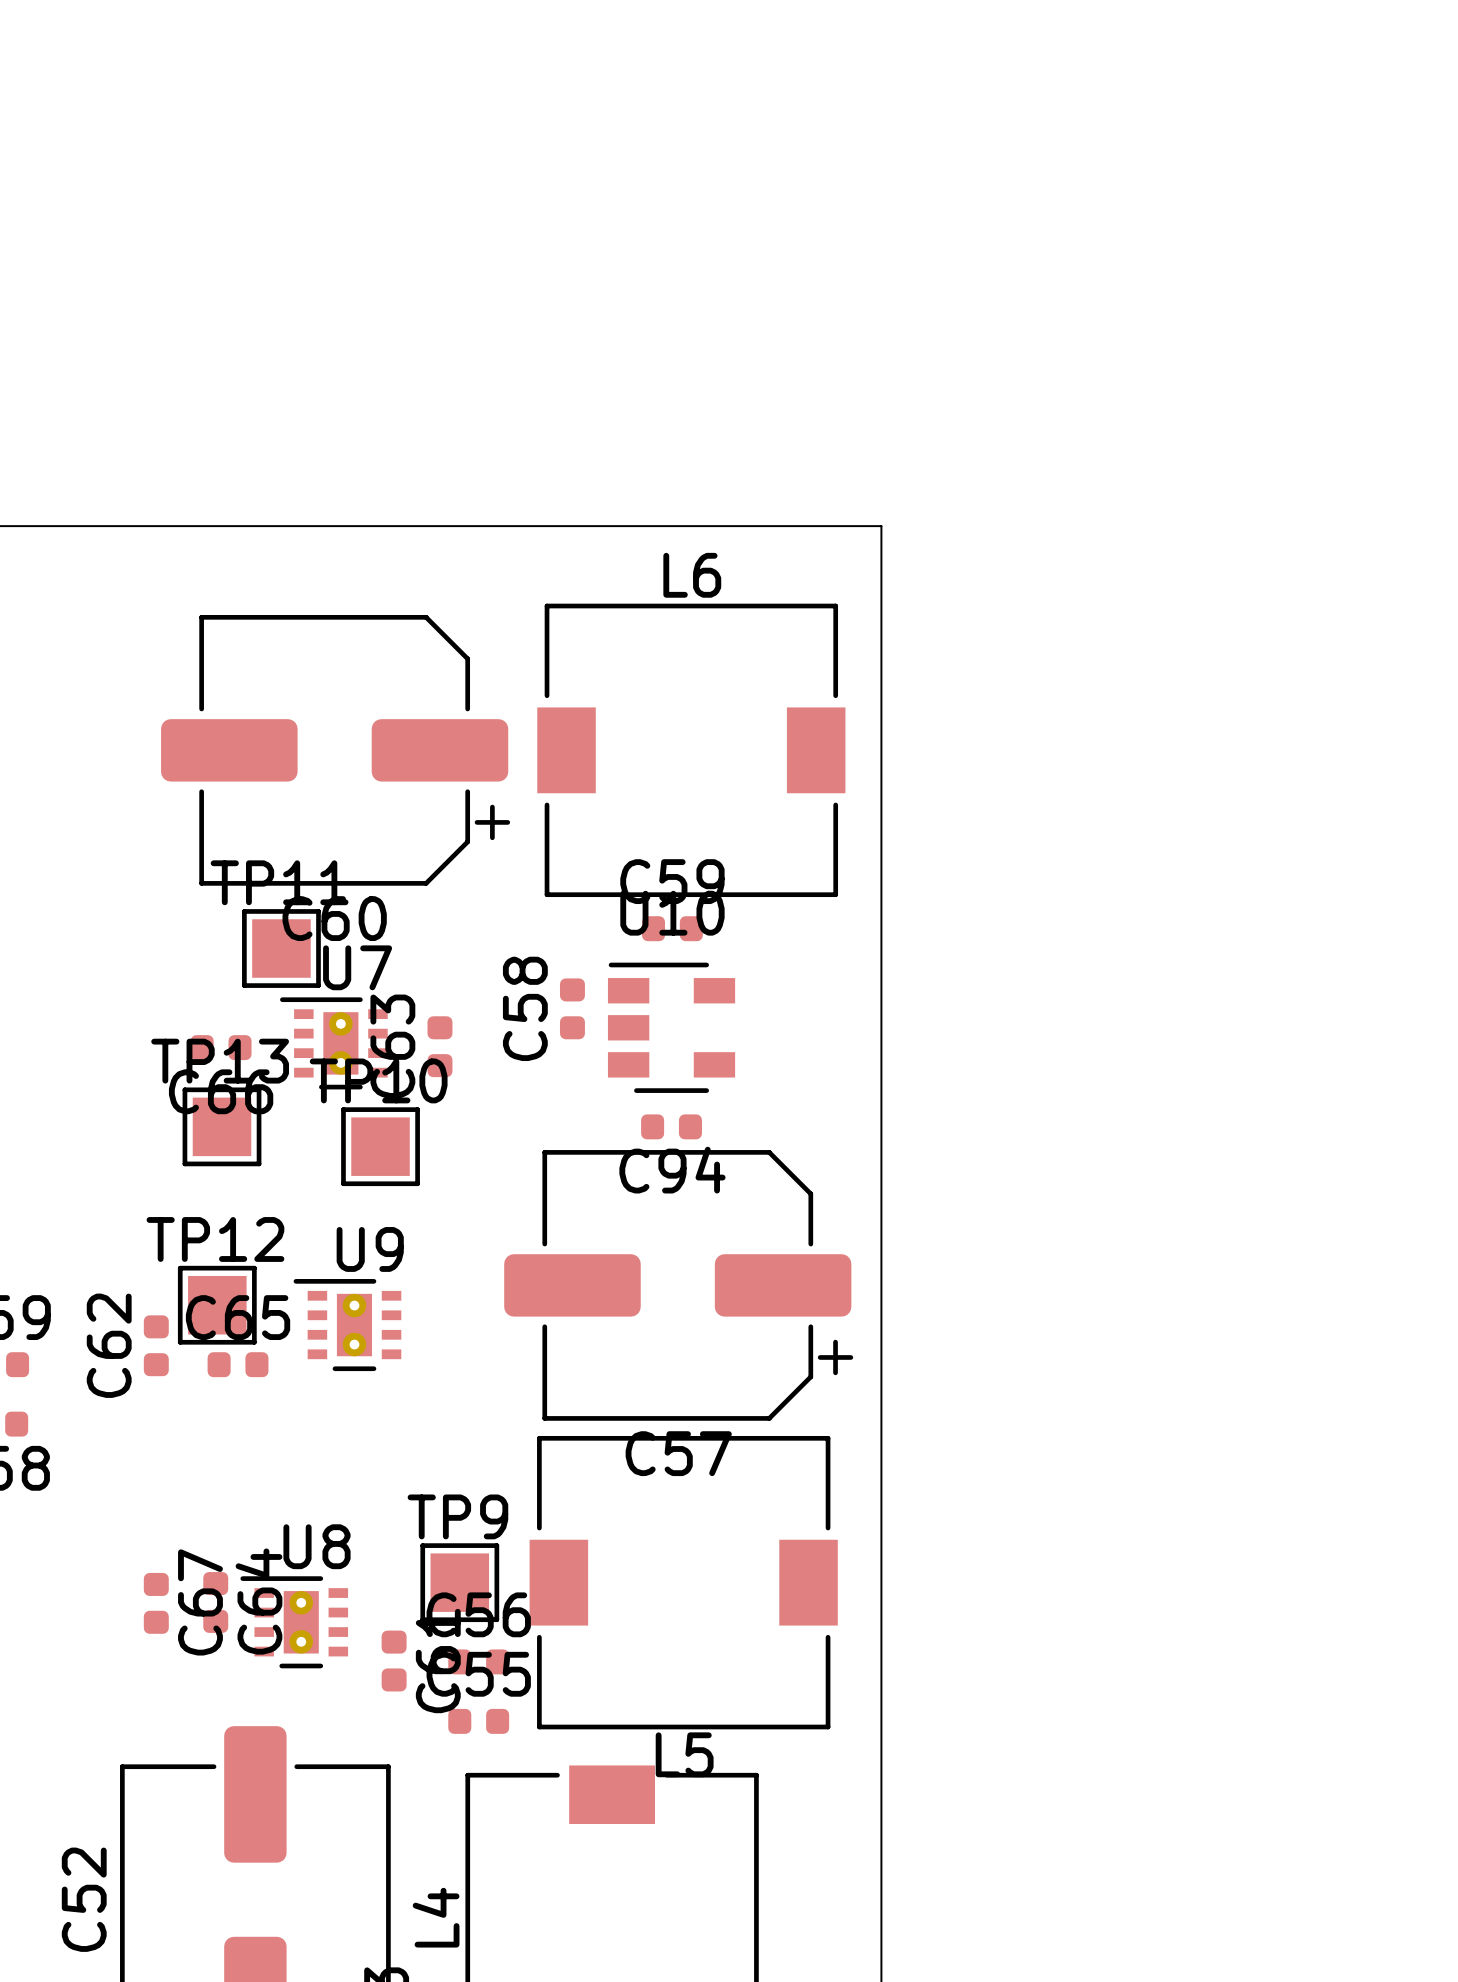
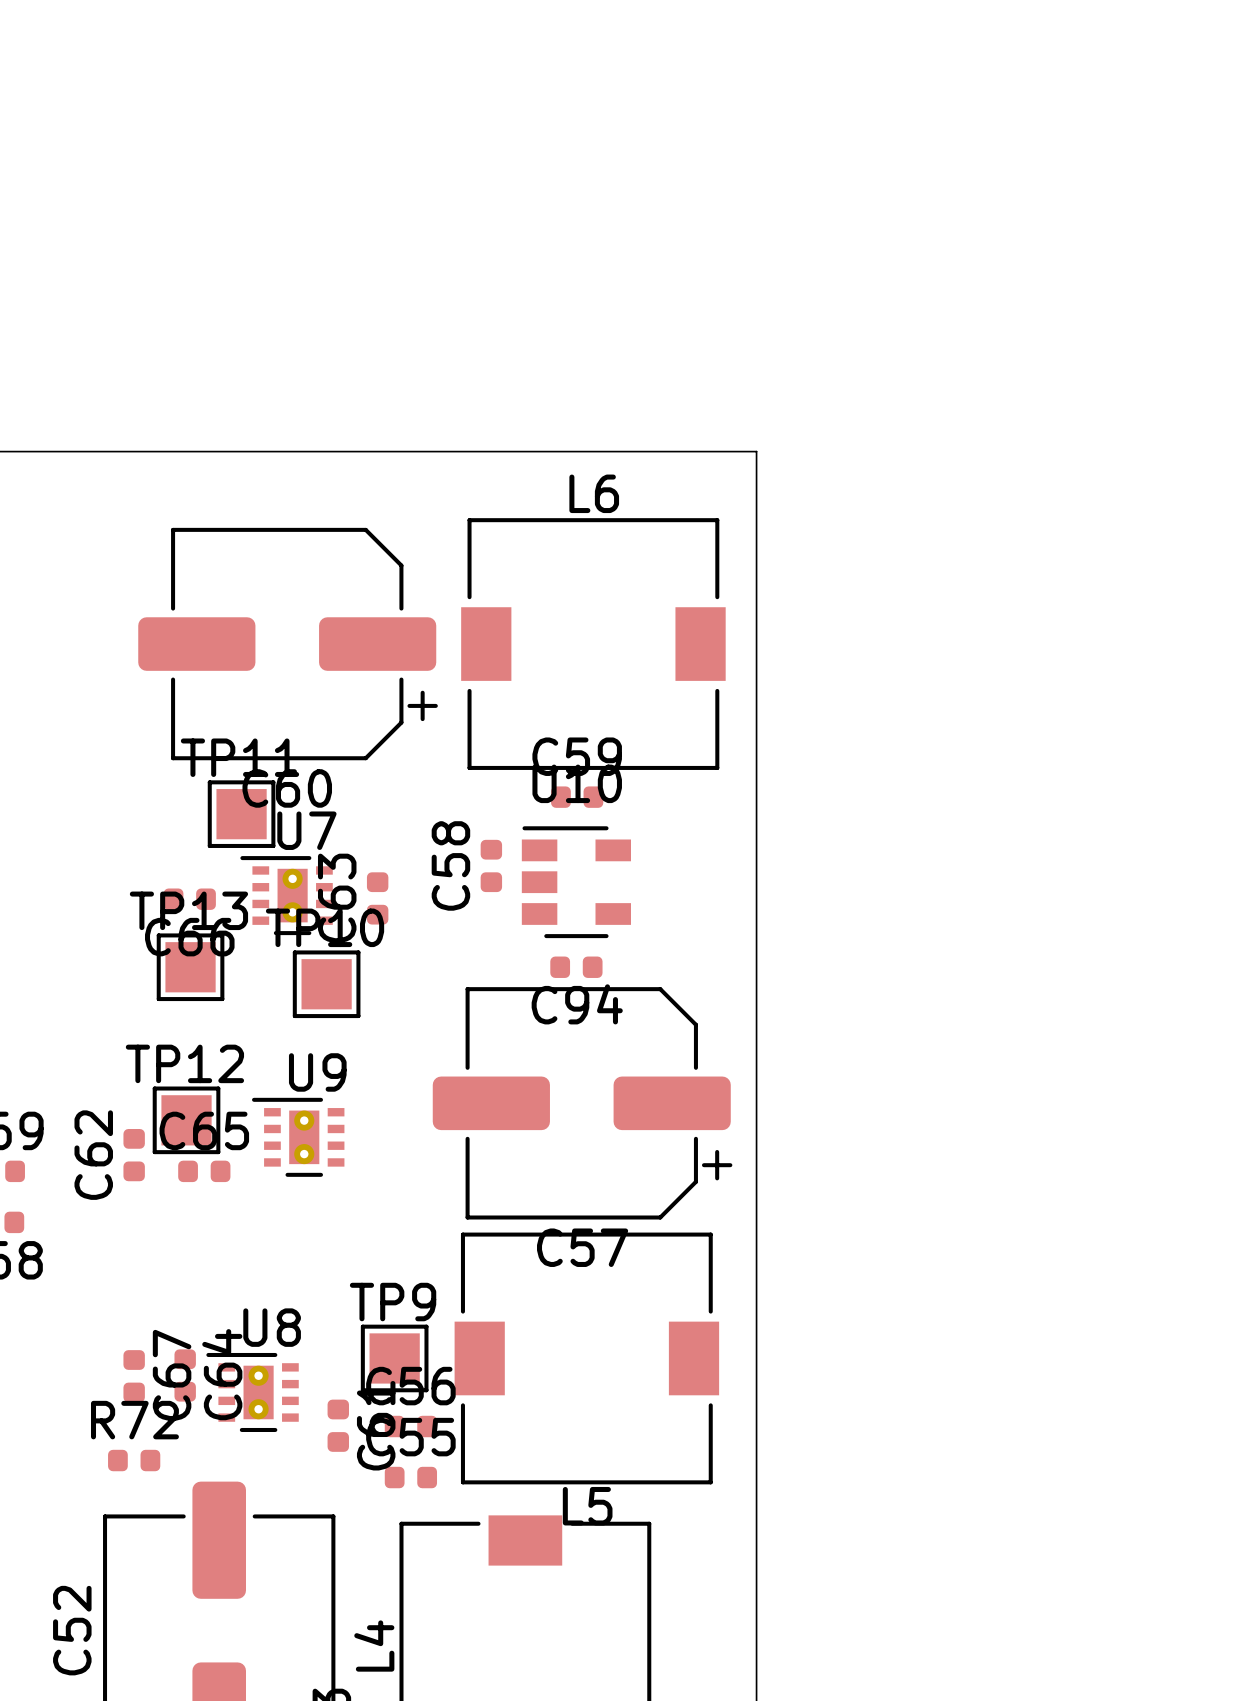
R72: none -> (134, 1460)

